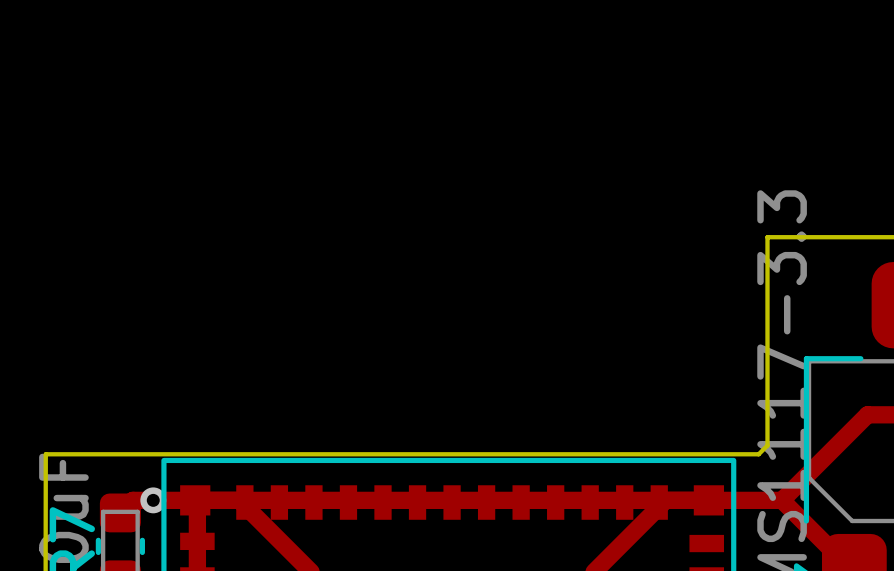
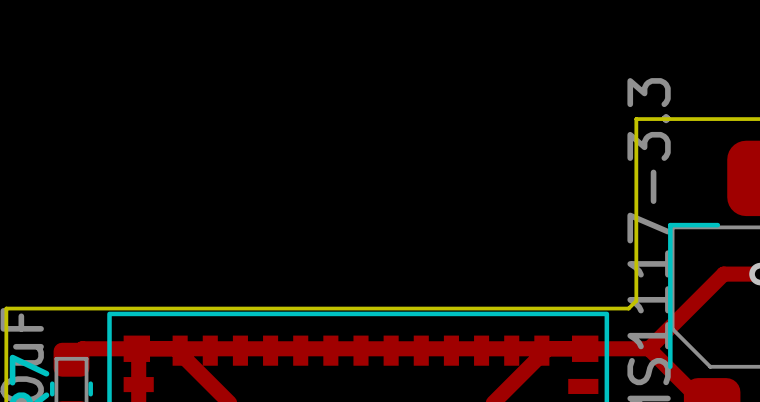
via: (153, 500) -> none

